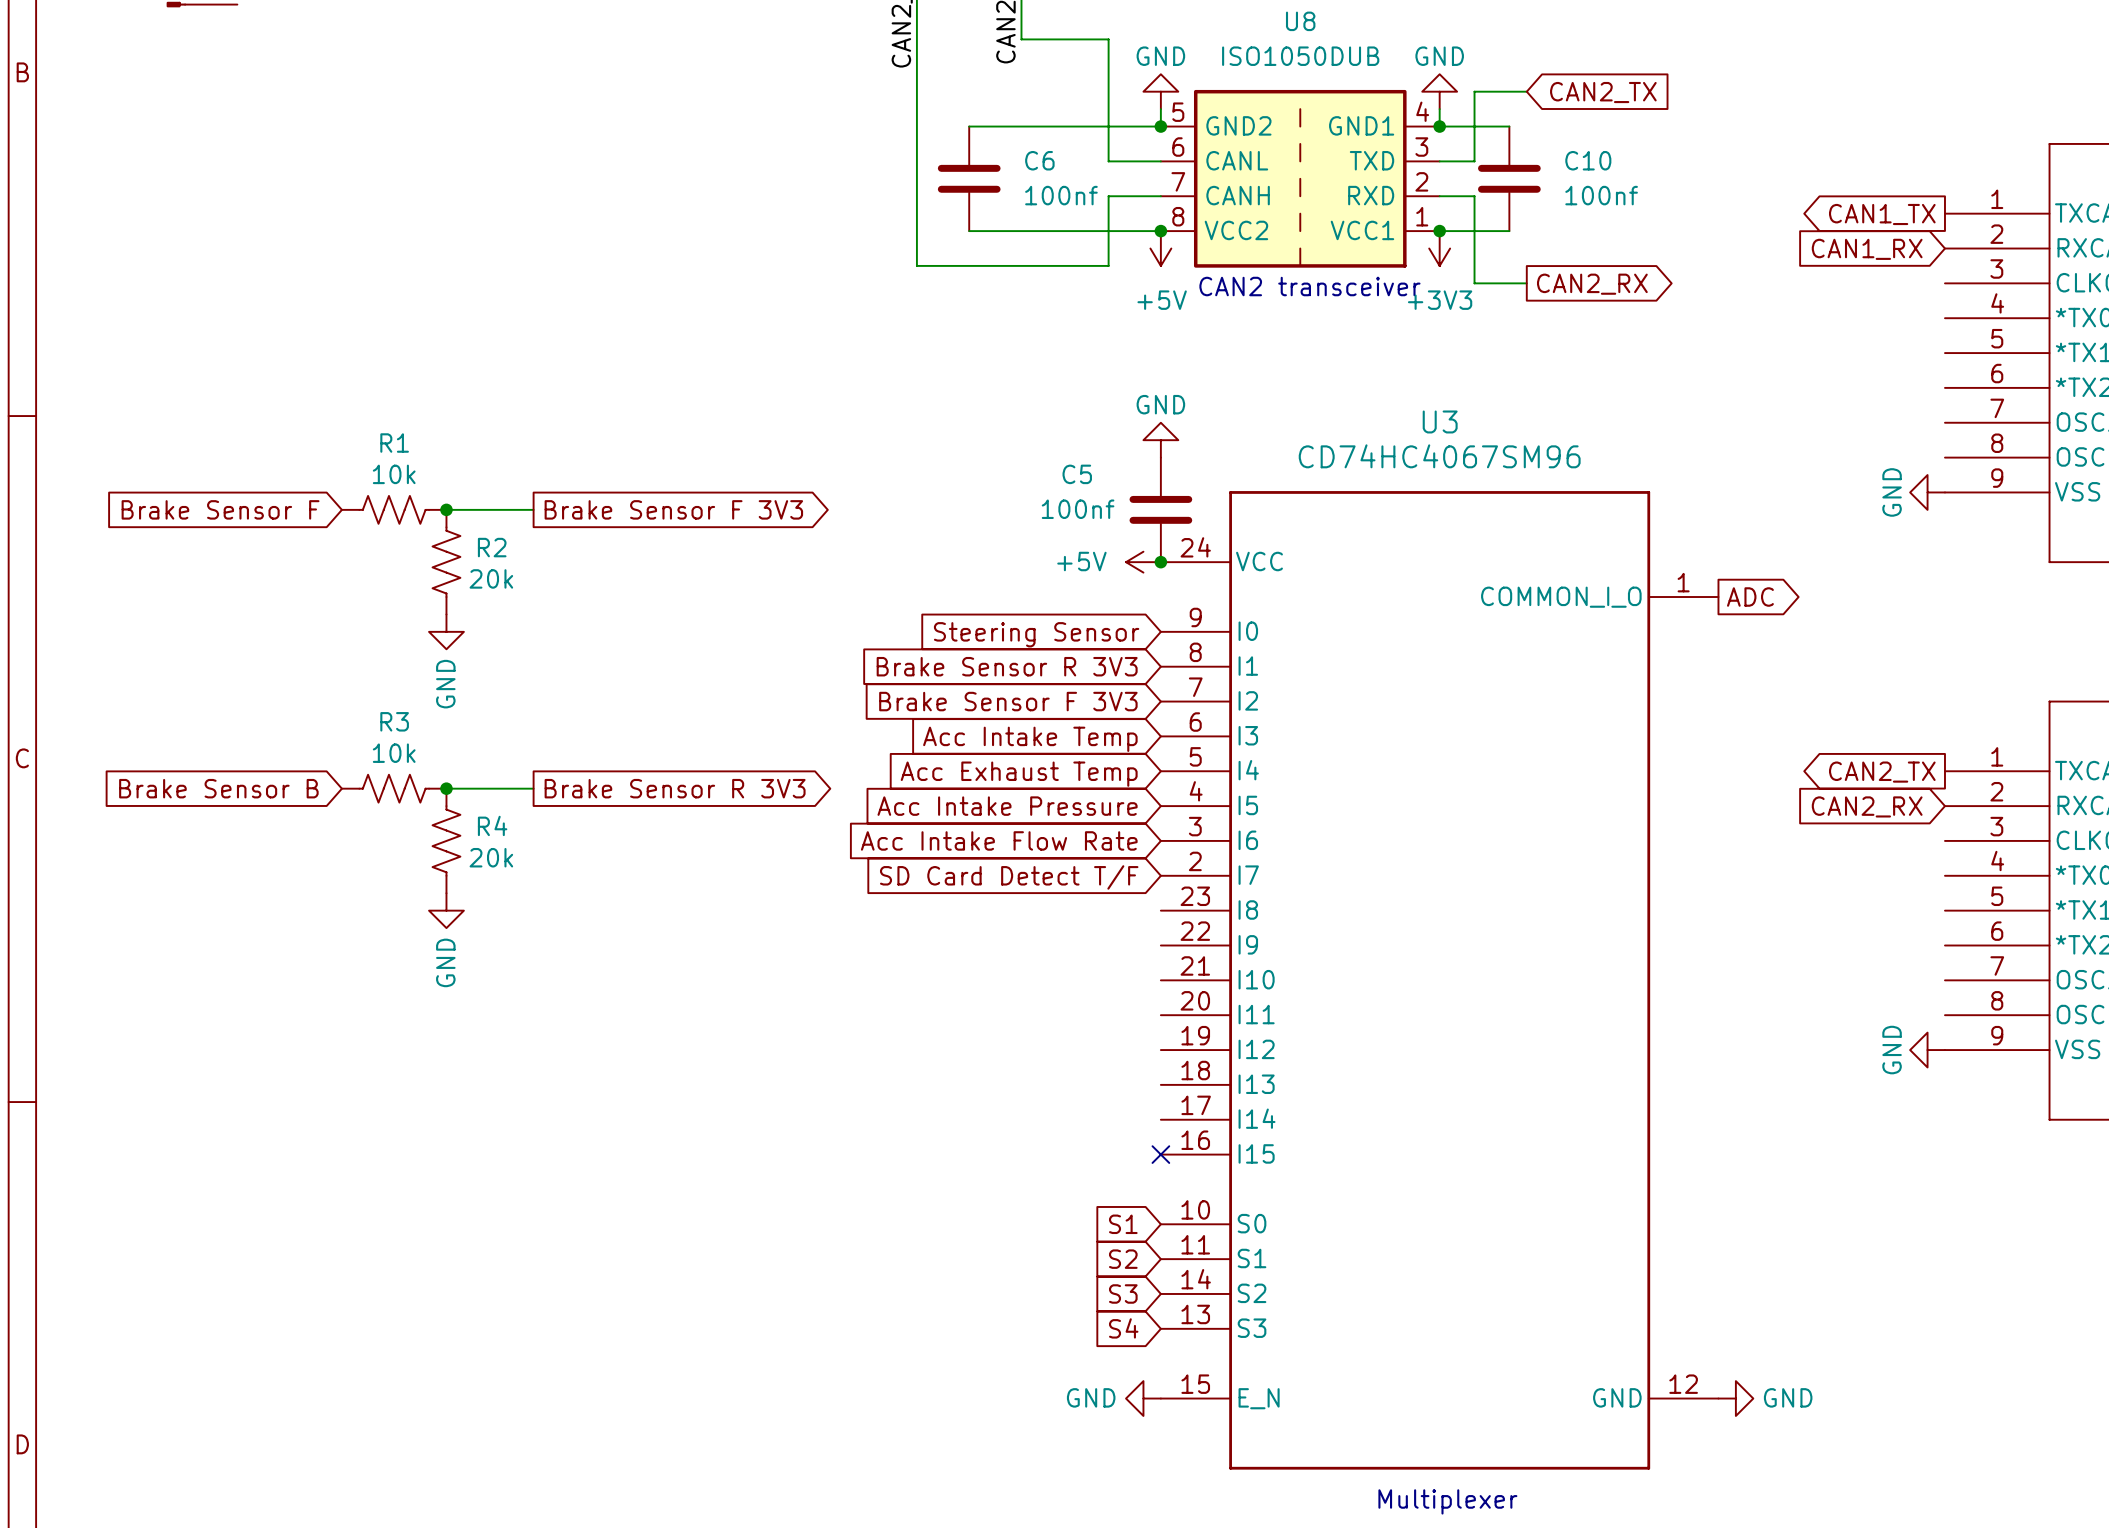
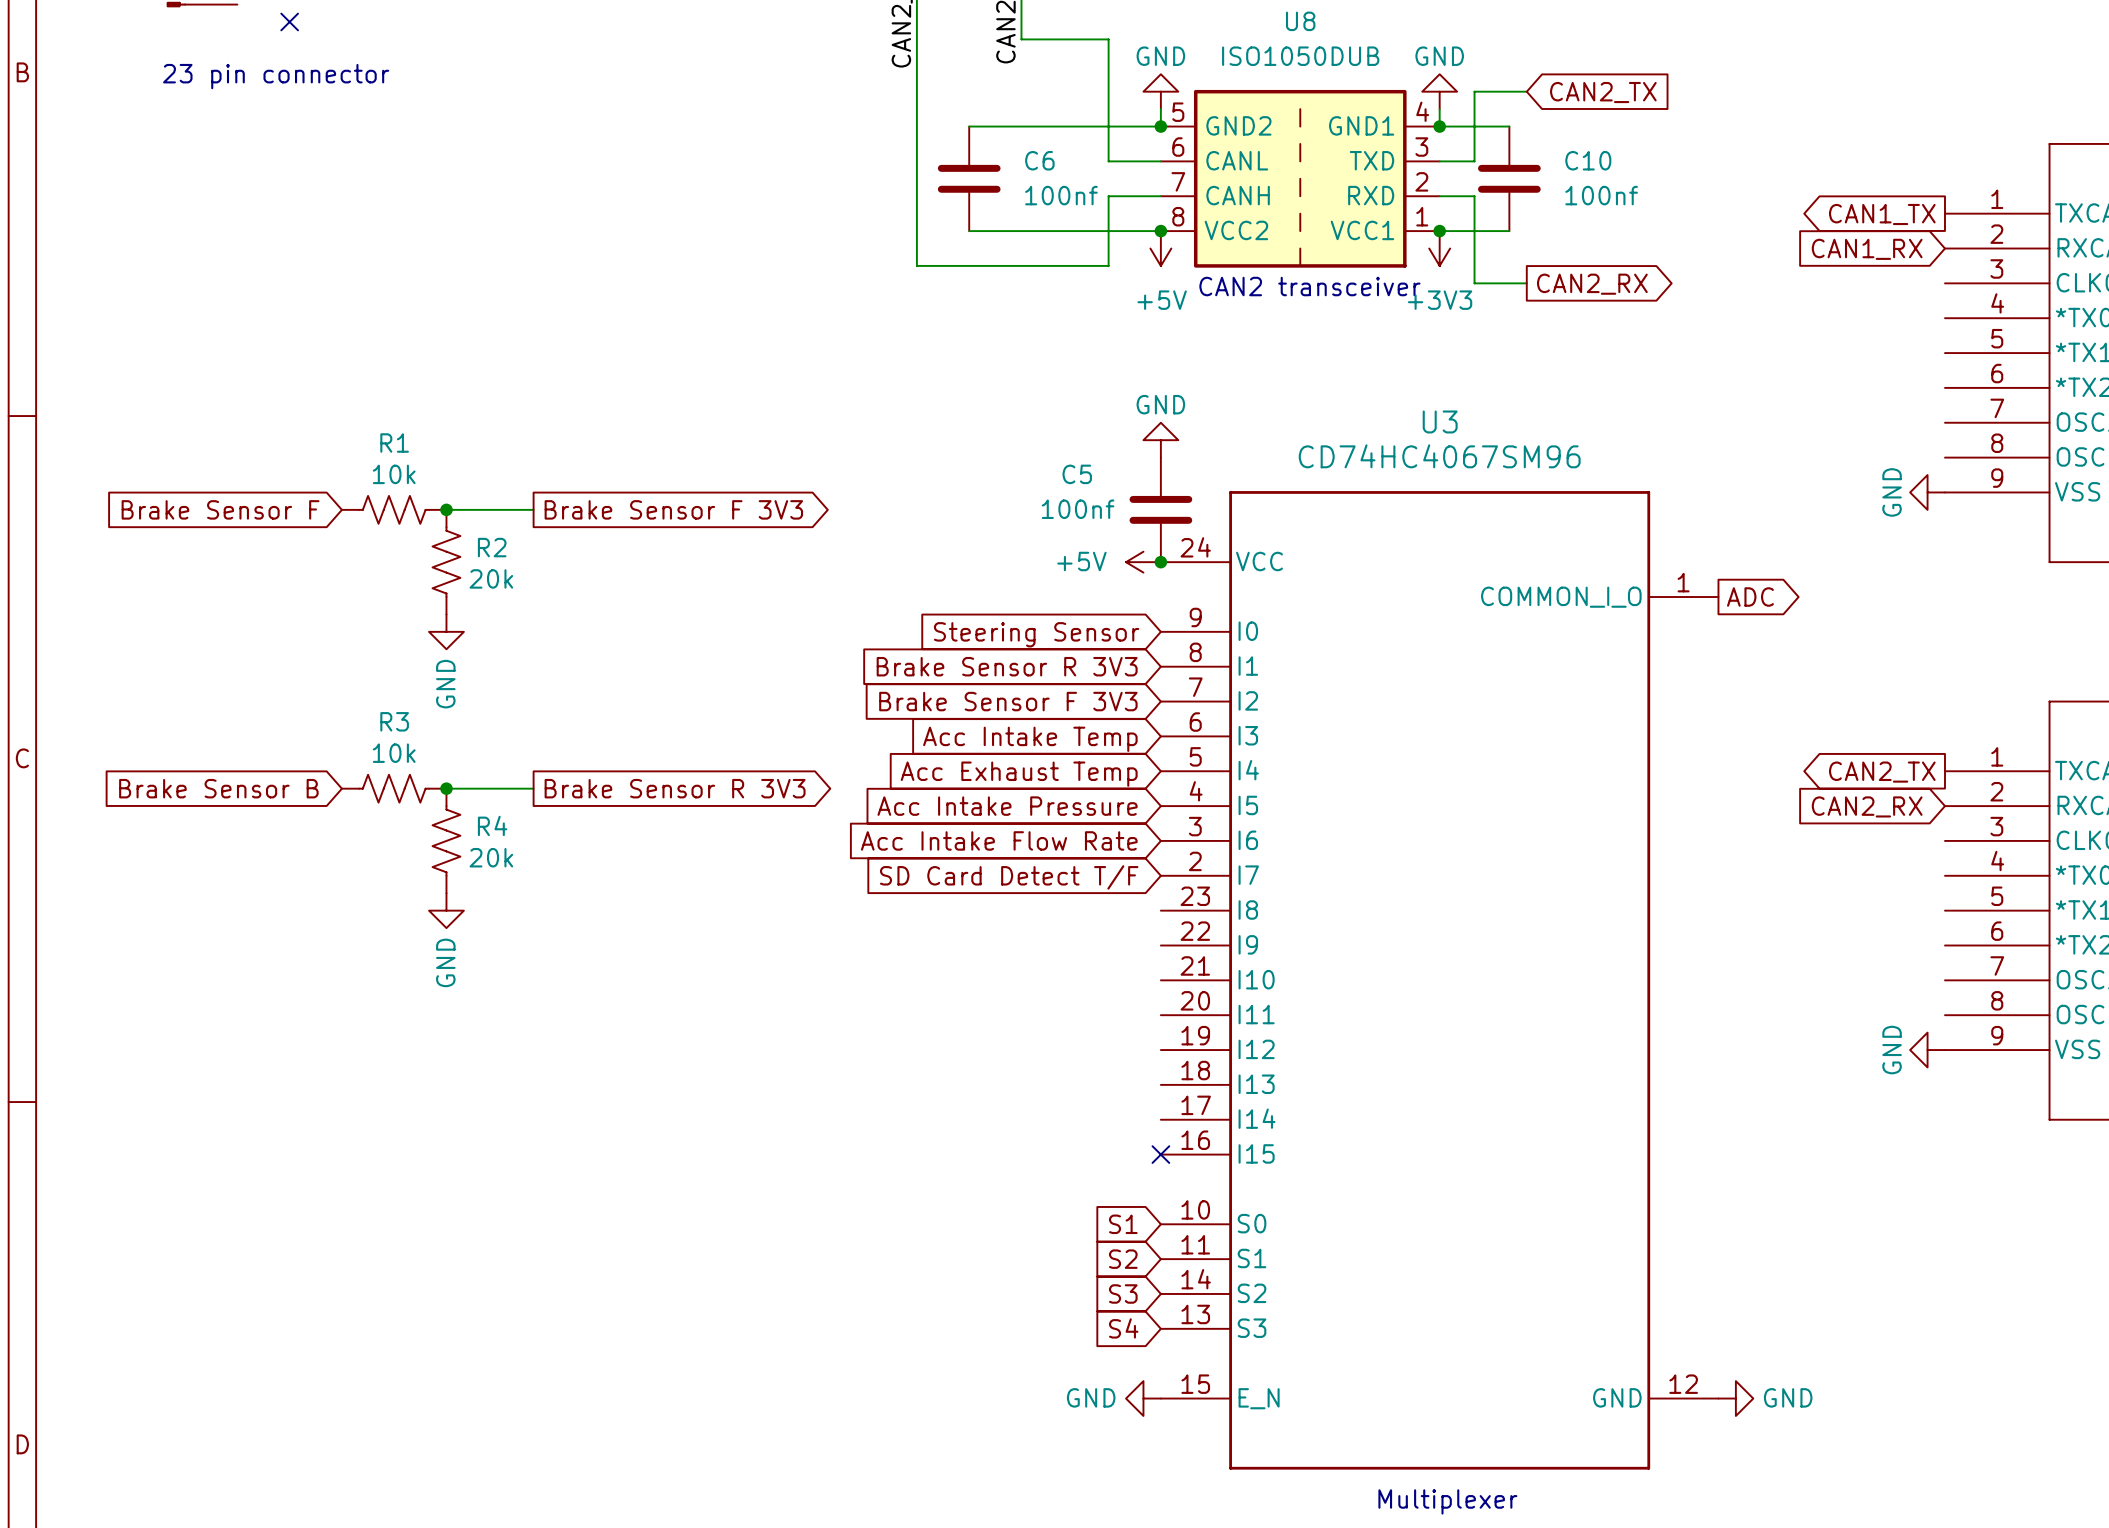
no-connect mark: none -> (289, 21)
text: none -> 23 pin connector (276, 76)

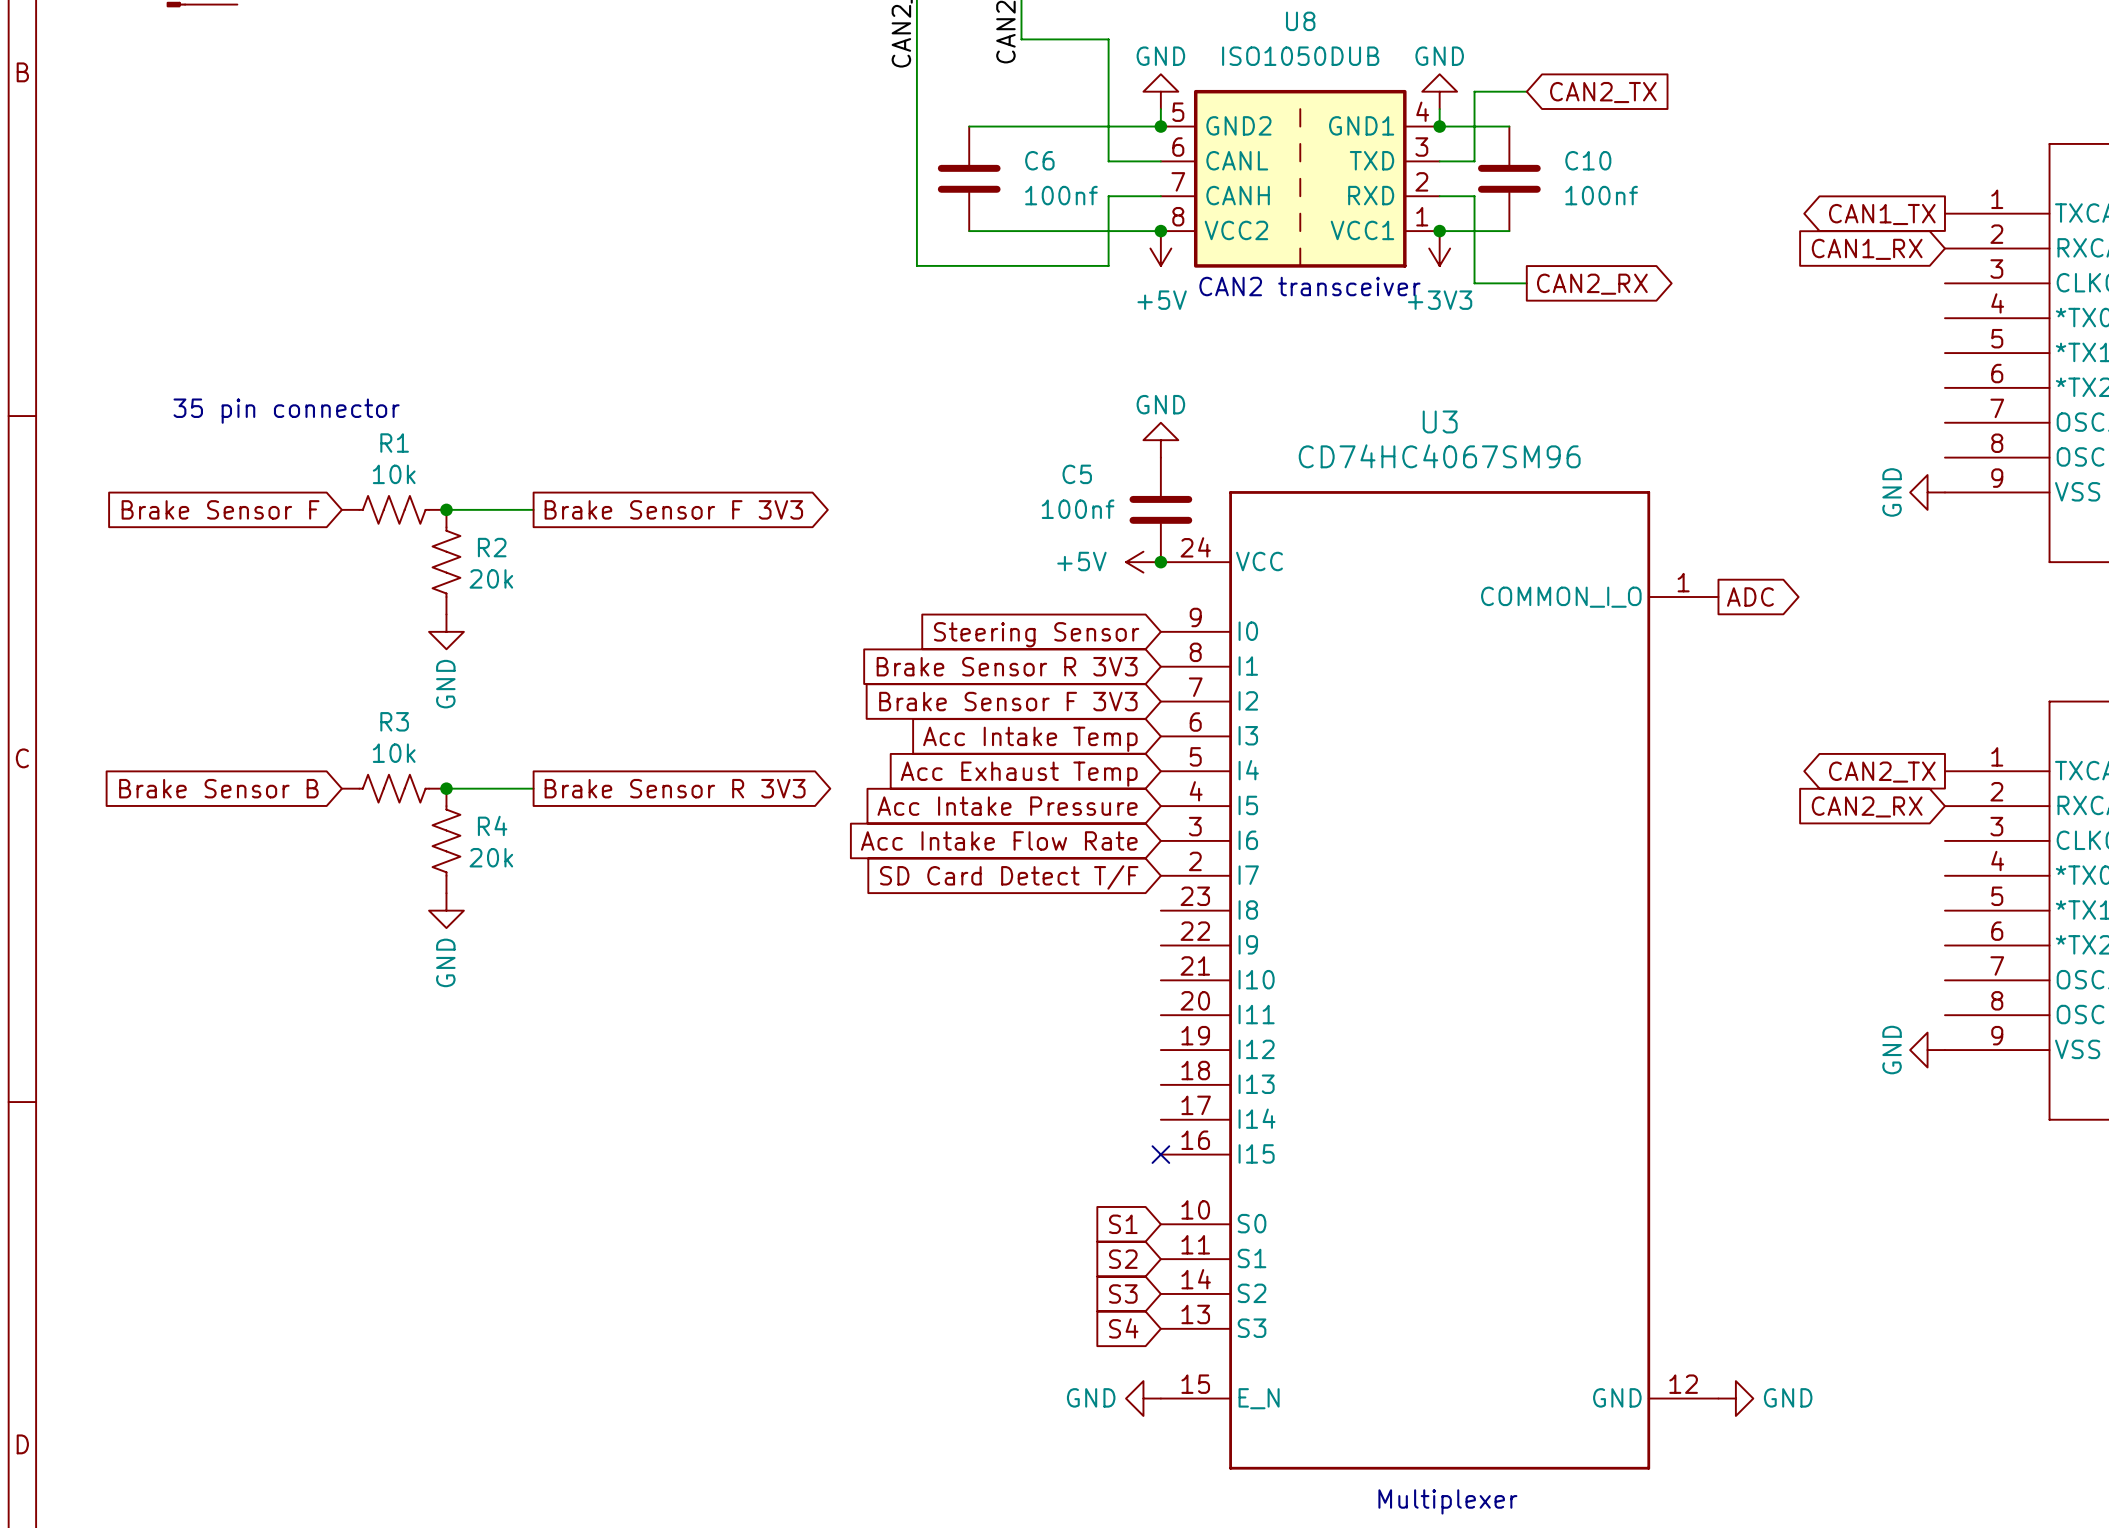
no-connect mark: (289, 21) -> none
text: 23 pin connector (276, 76) -> none
text: none -> 35 pin connector (286, 411)

